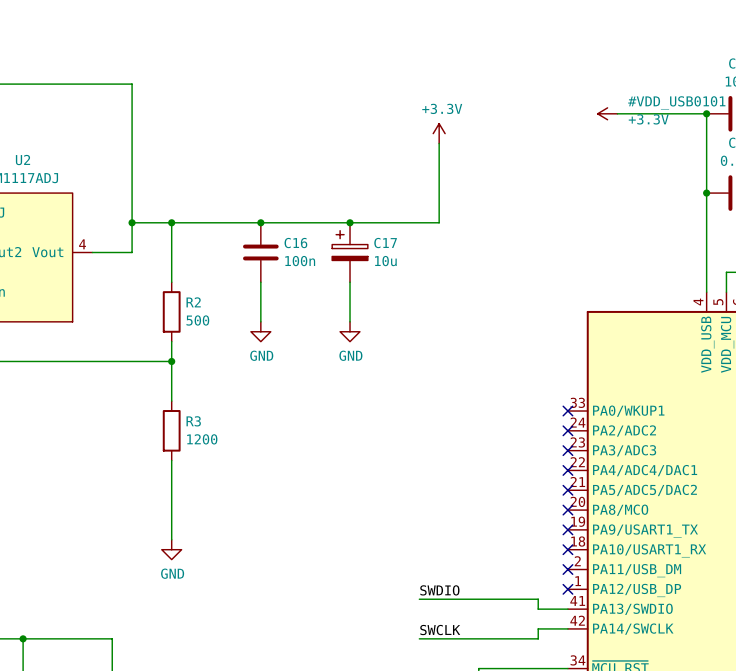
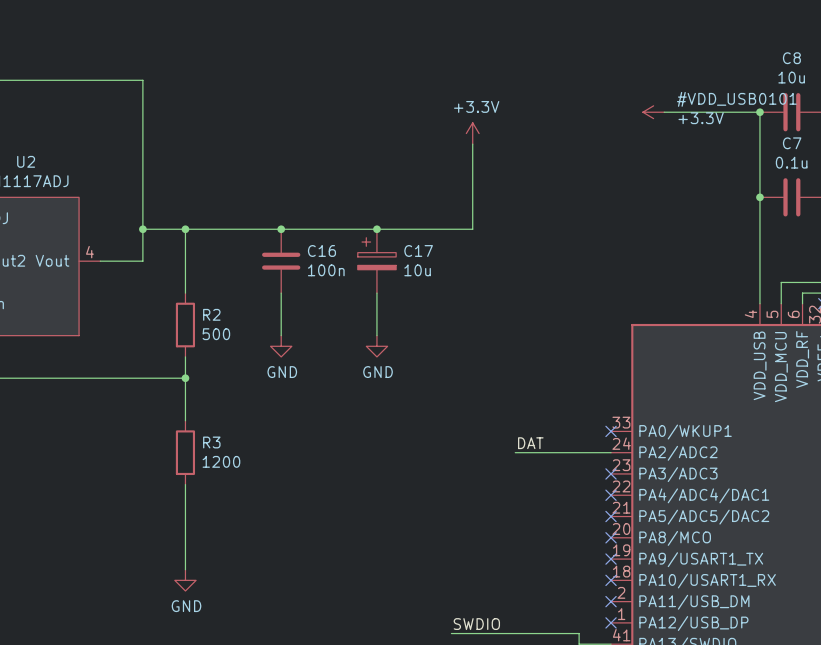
label: none -> DAT (530, 443)
wire: none -> (515, 452) (611, 452)
no-connect mark: (567, 430) -> none

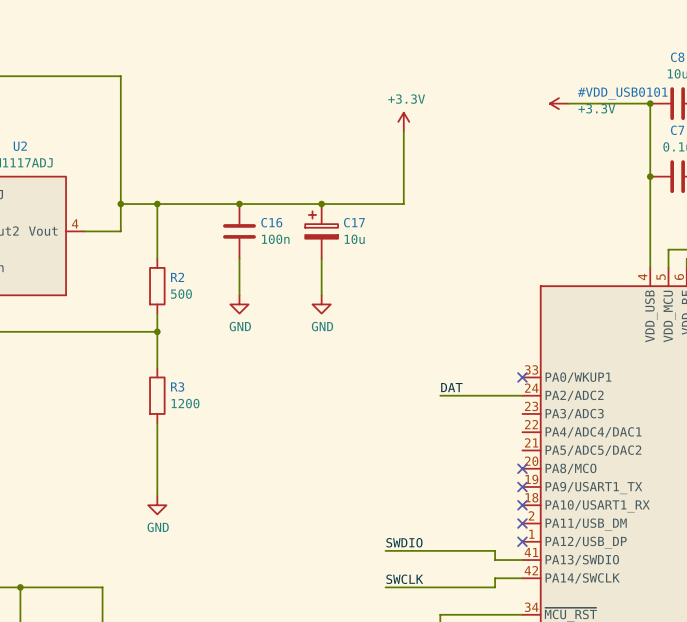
no-connect mark: (611, 473) -> none
no-connect mark: (611, 495) -> none
no-connect mark: (611, 516) -> none

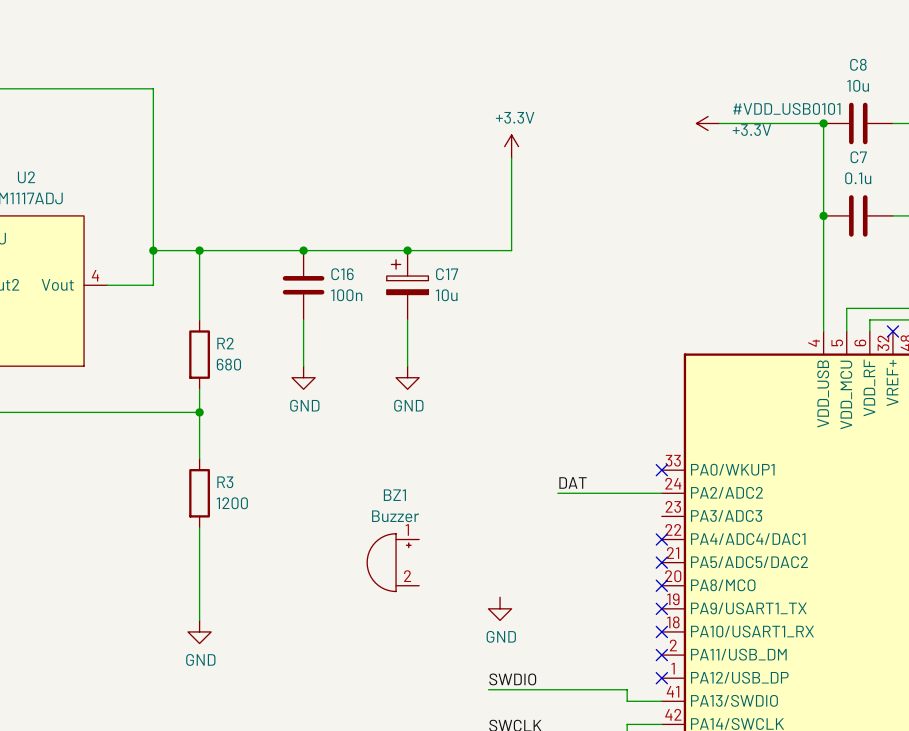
R2 value: 500 (181, 294) -> 680 (228, 364)
no-connect mark: none -> (661, 539)
BZ1: none -> Buzzer (393, 562)
no-connect mark: none -> (661, 562)
power symbol: none -> GND (500, 608)

